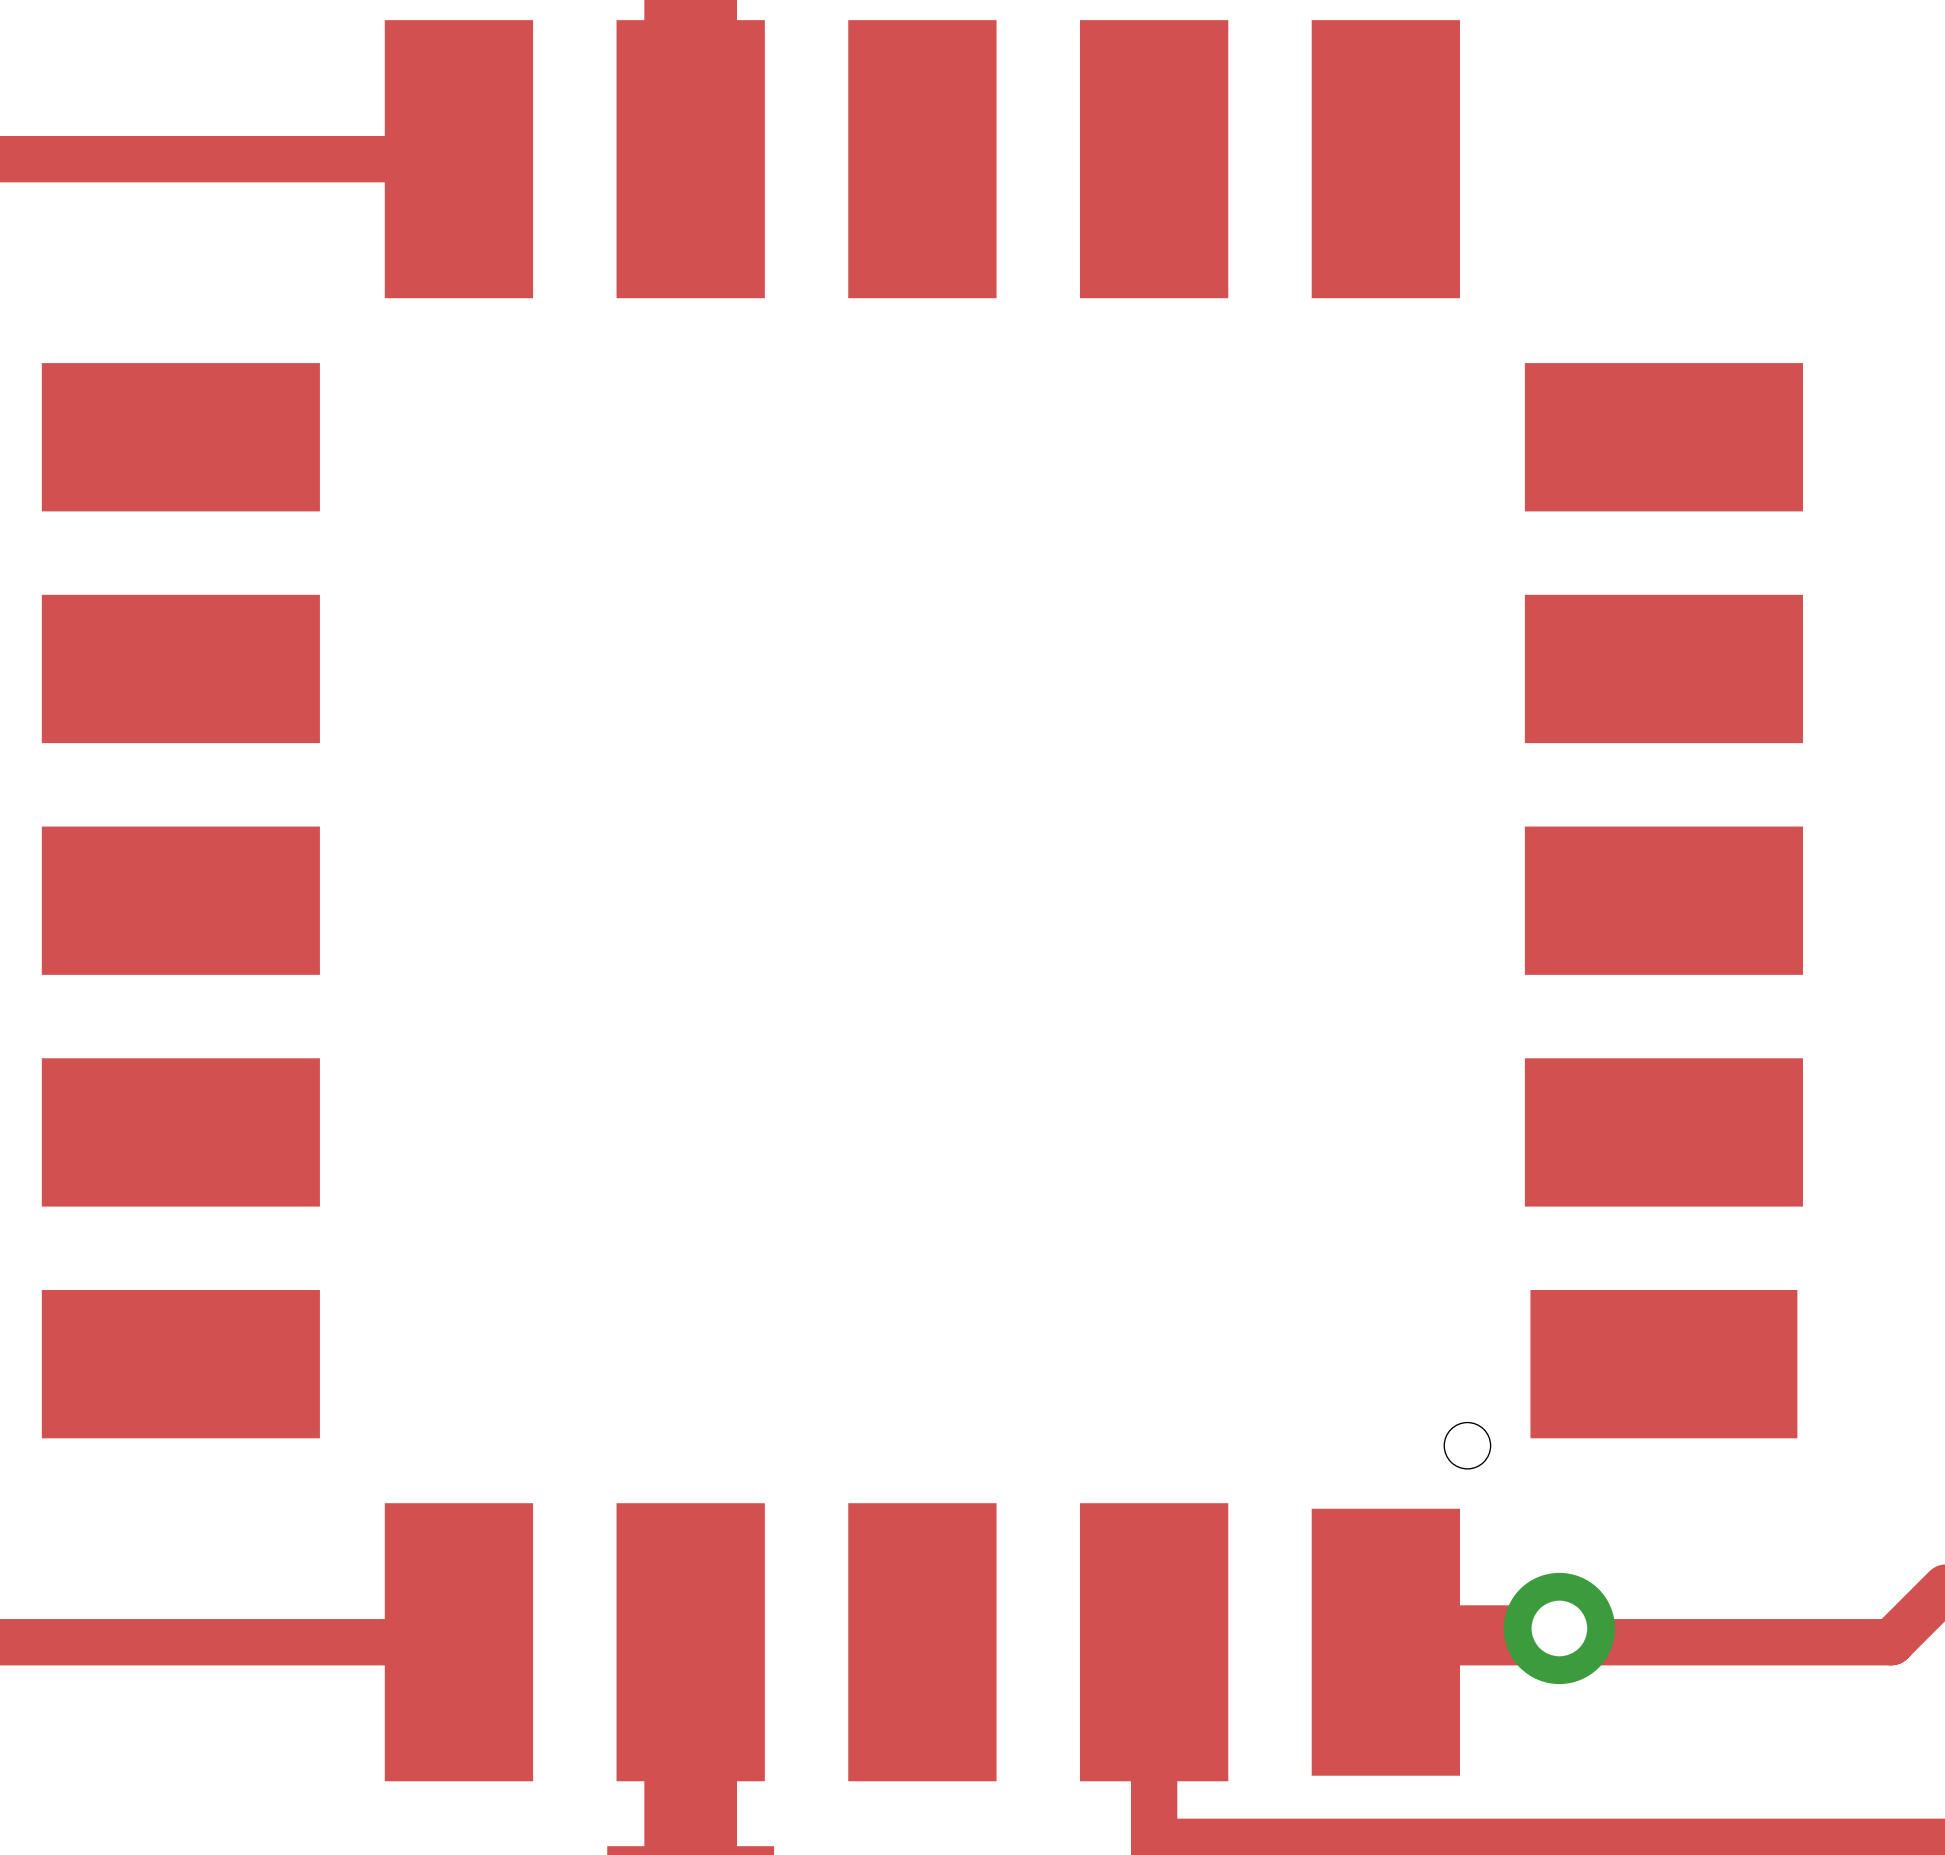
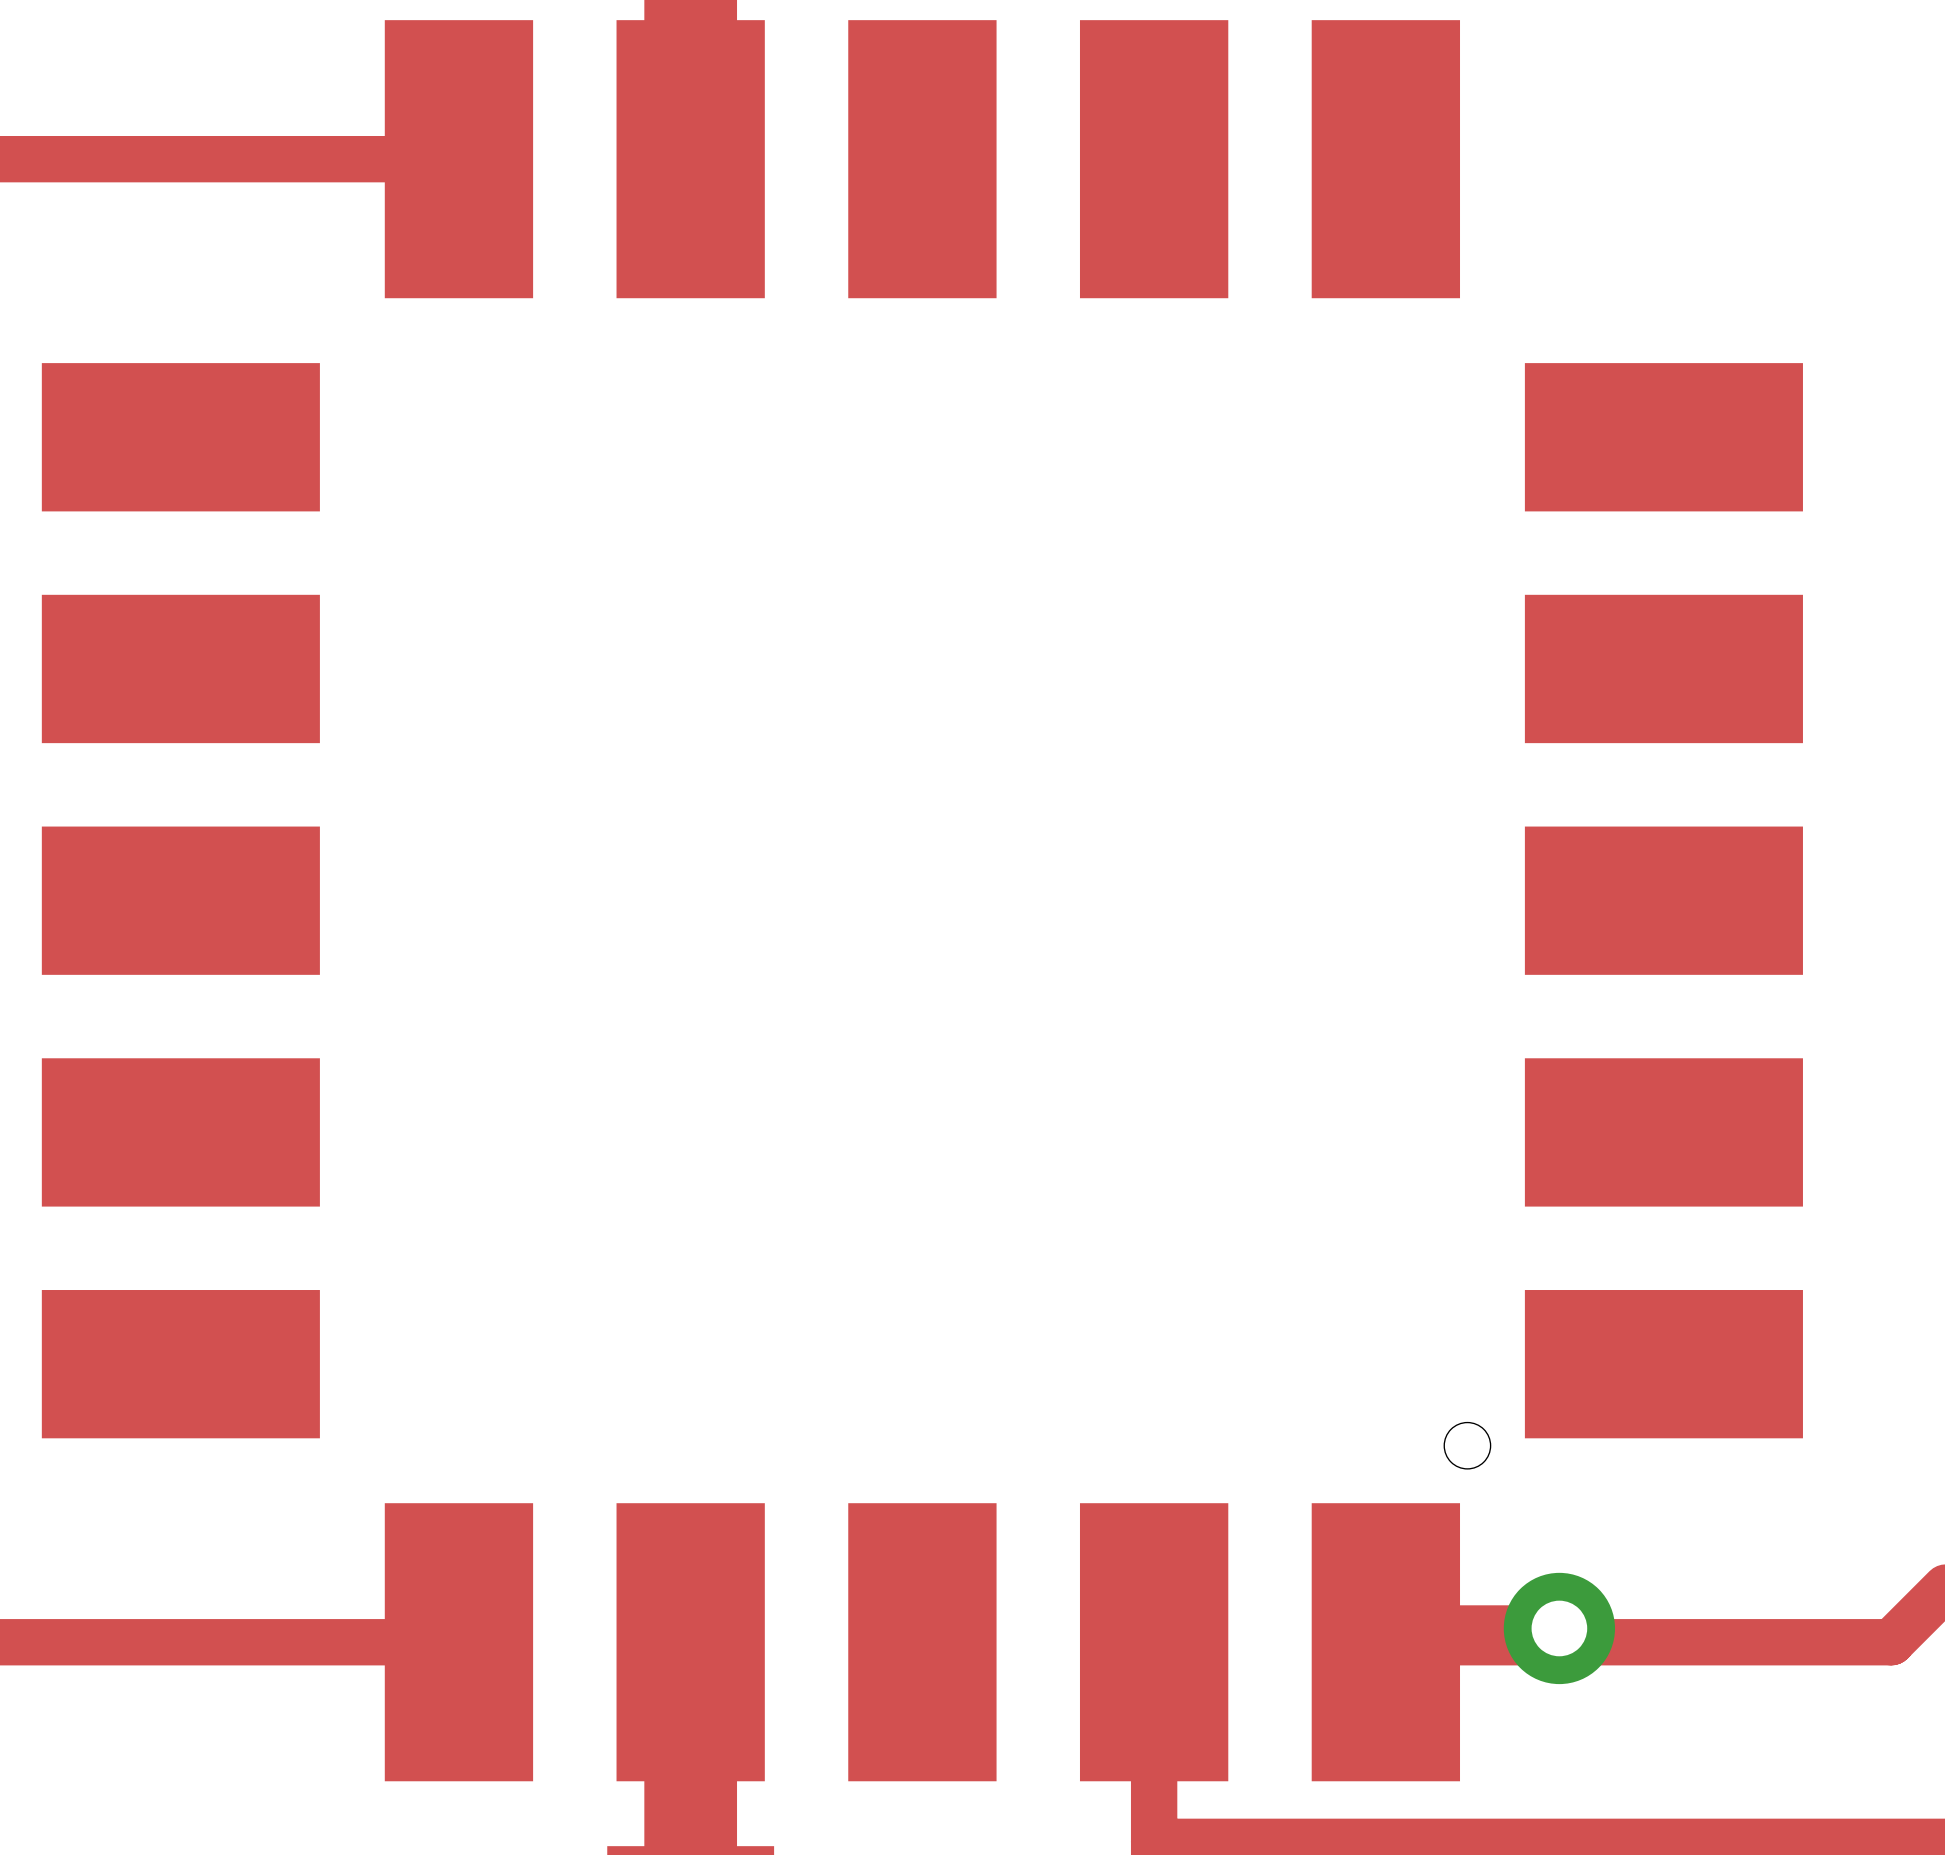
part footprint: [41, 20, 1803, 1782] -> [41, 20, 1803, 1782]

